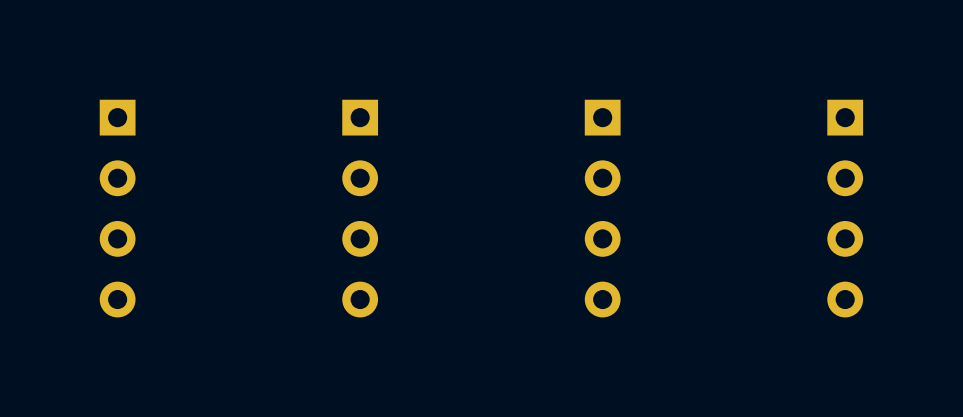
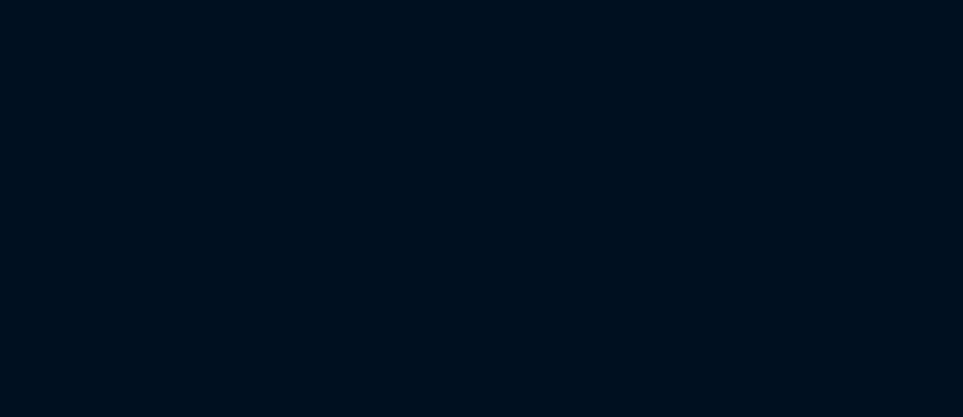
part: (117, 208) -> none
part: (360, 208) -> none
part: (602, 208) -> none
part: (845, 208) -> none

